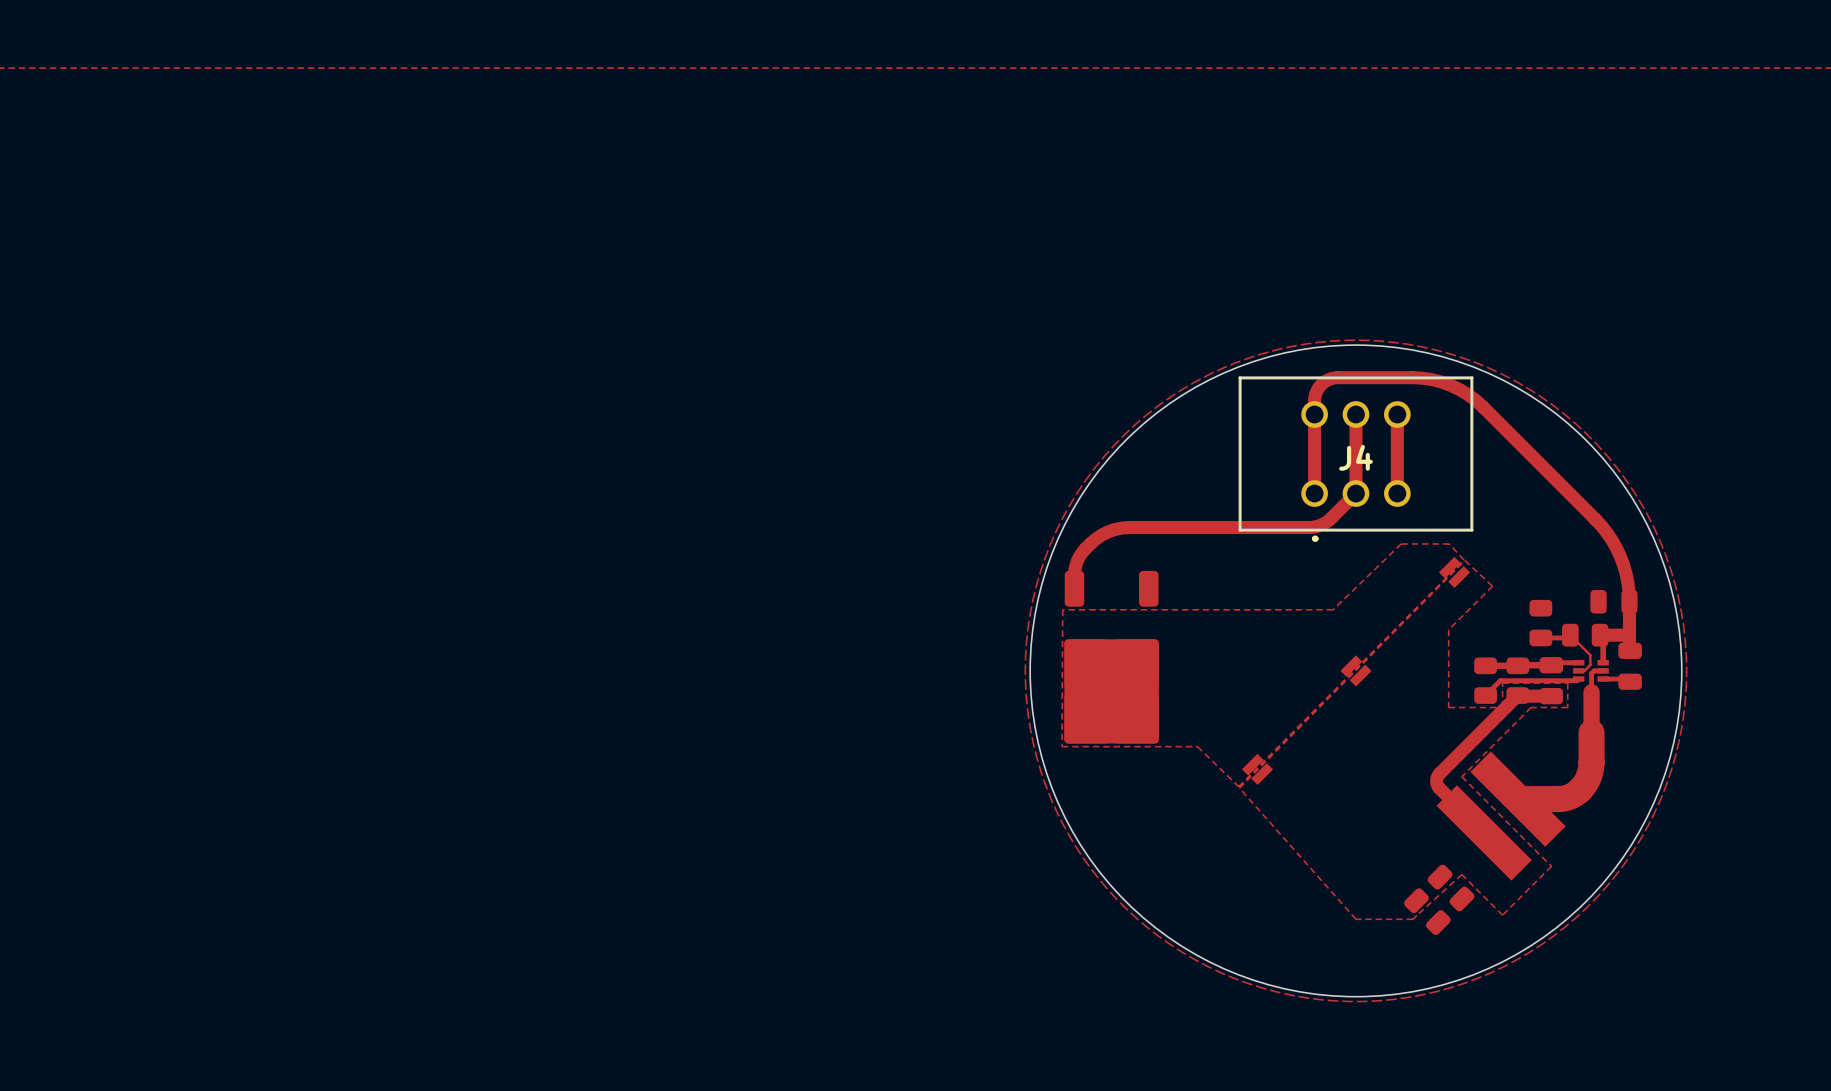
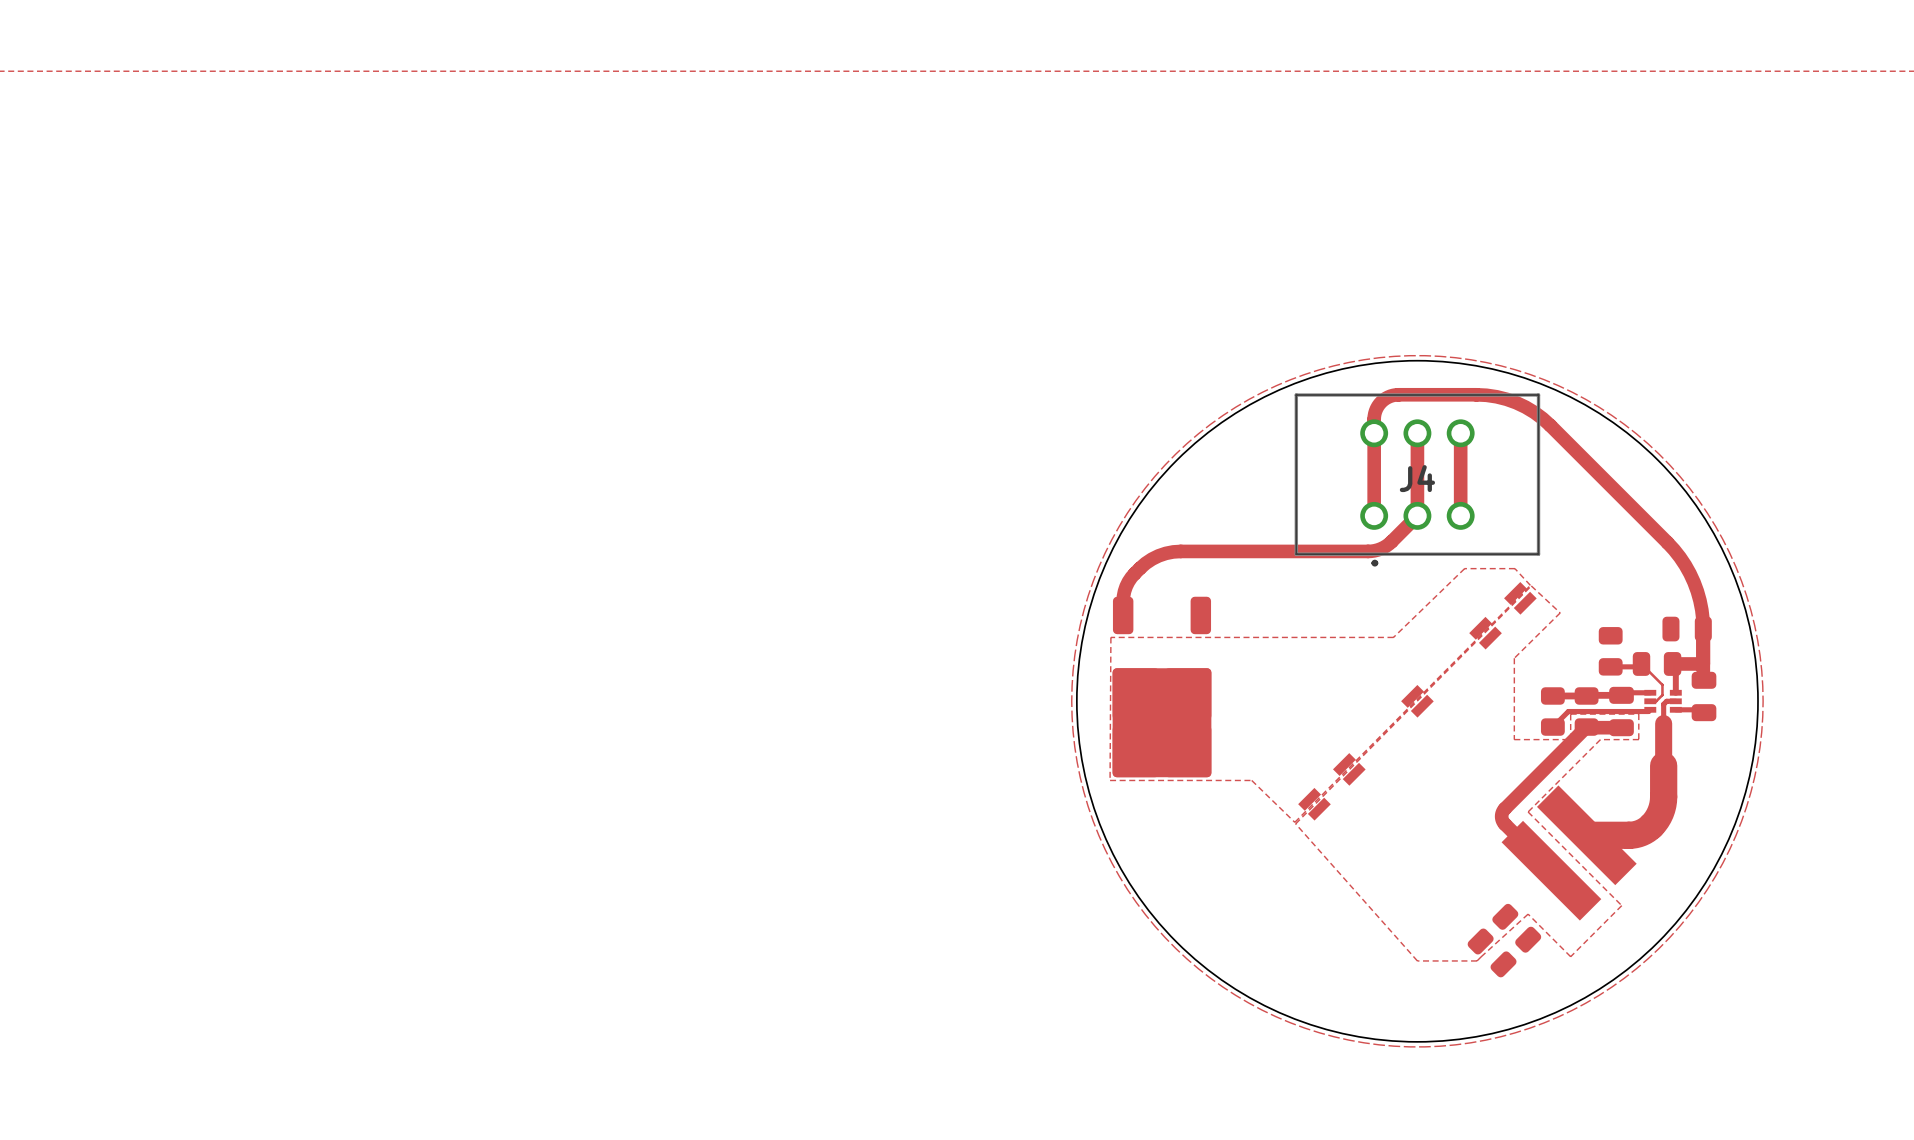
part: none -> (1485, 633)
part: none -> (1349, 769)

